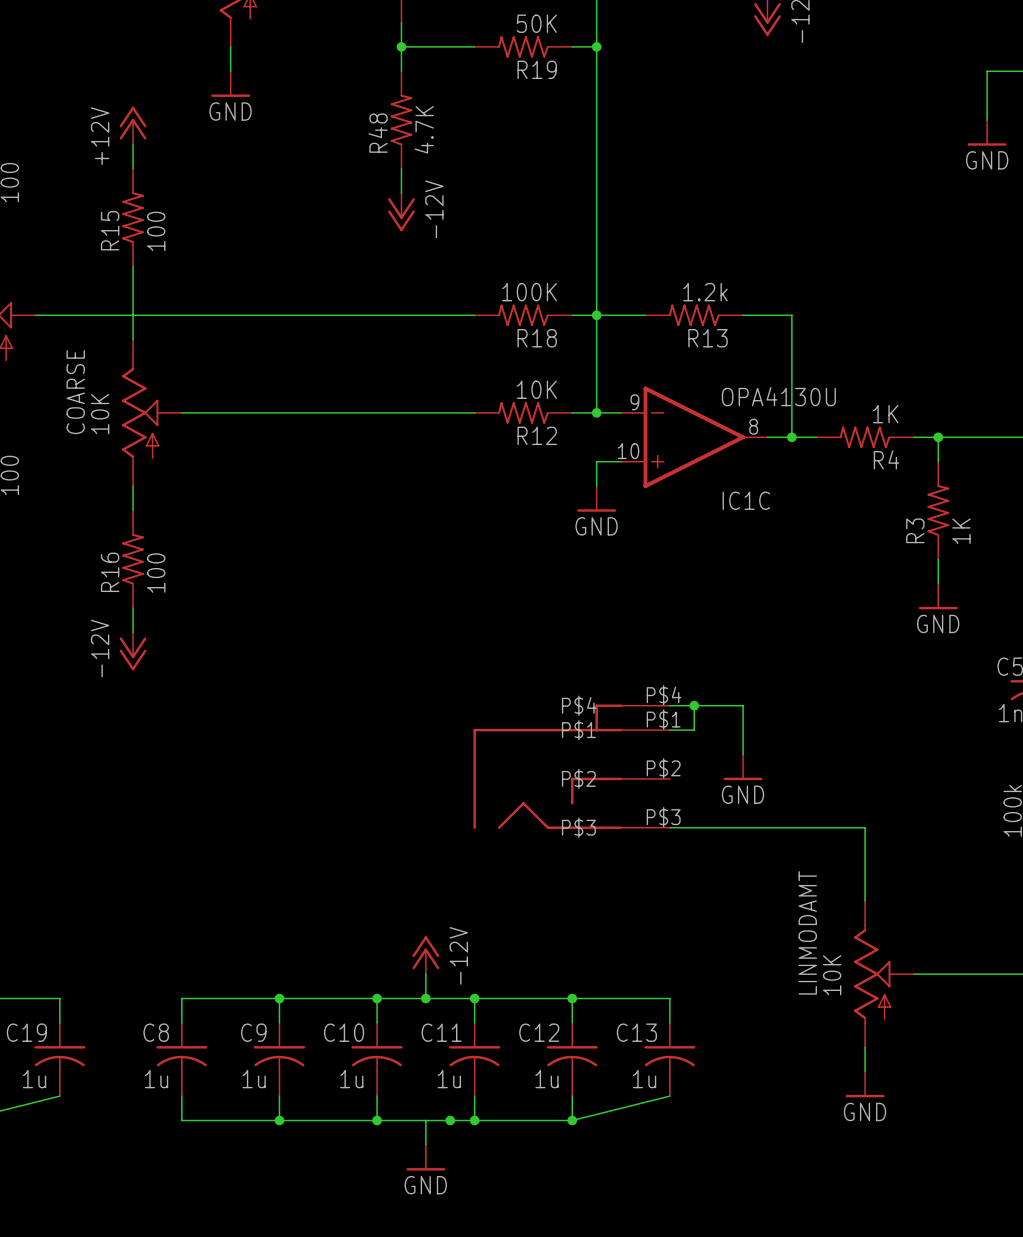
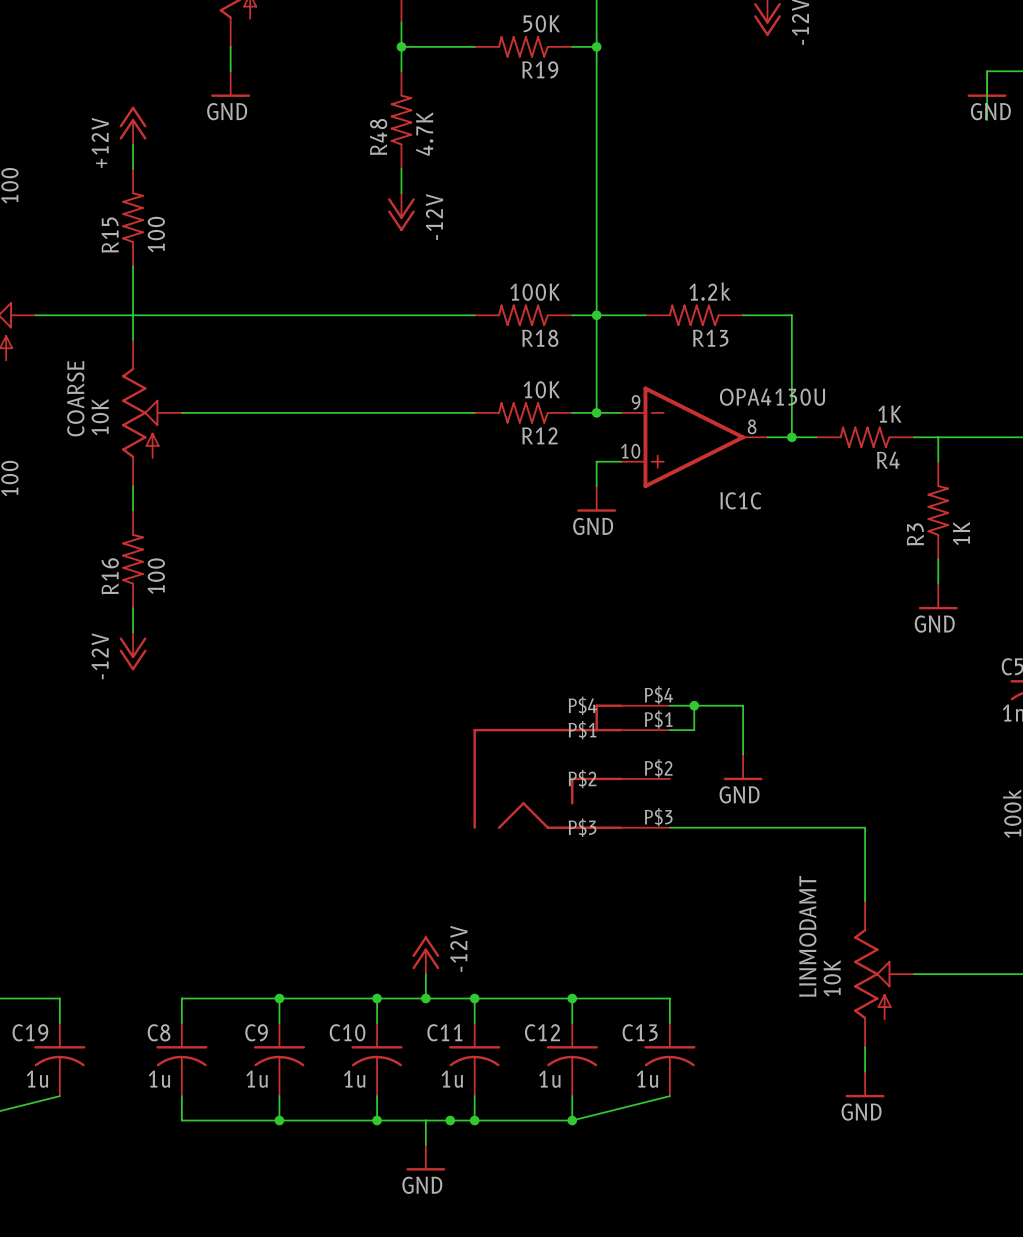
power symbol position: GND (987, 132) -> GND (987, 84)
junction: (938, 437) -> none

